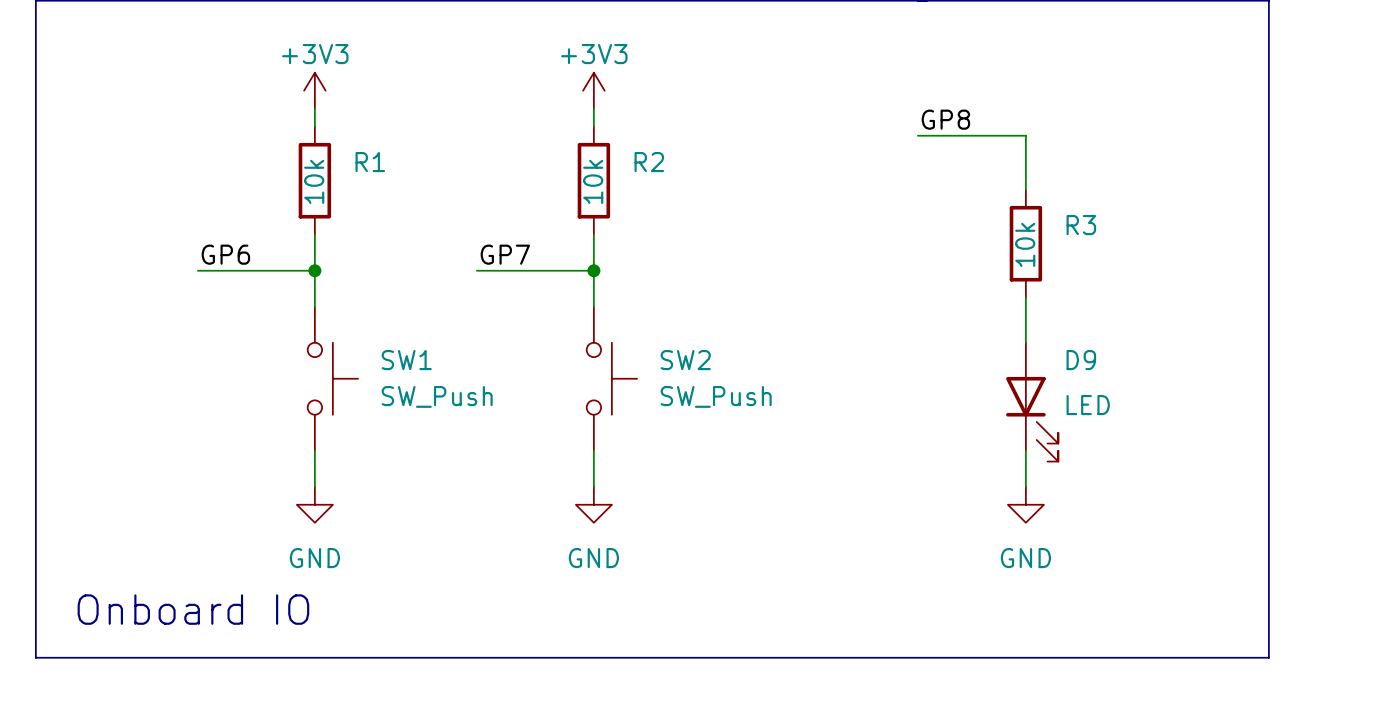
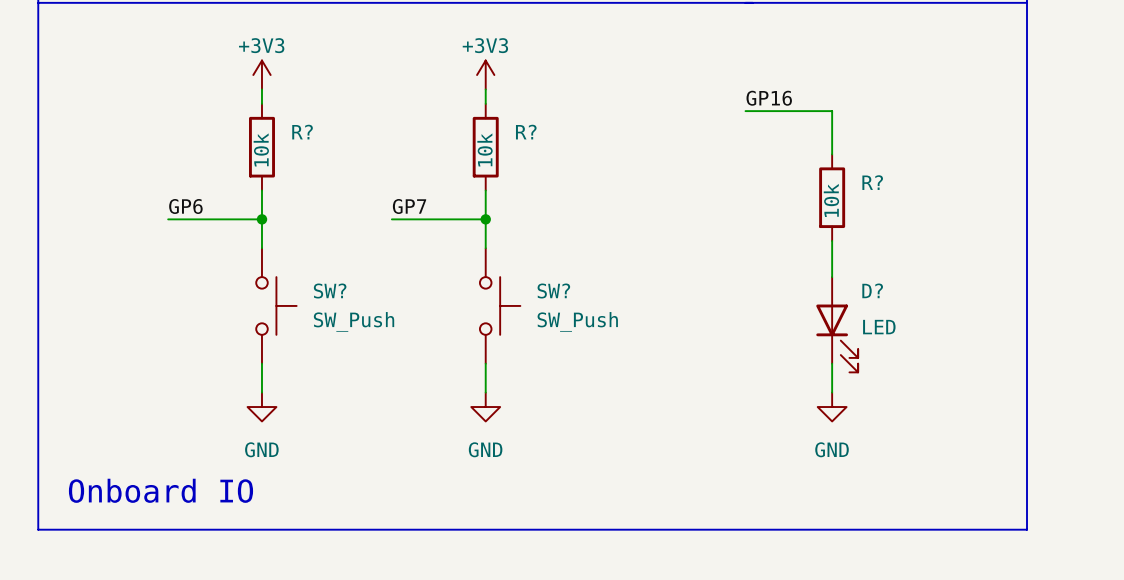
label: GP8 (945, 119) -> GP16 (769, 98)
R1 name: R1 (370, 162) -> R? (302, 132)
R2 name: R2 (649, 162) -> R? (526, 132)
R3 name: R3 (1081, 225) -> R? (872, 182)
SW1 name: SW1 (406, 360) -> SW? (330, 291)
SW2 name: SW2 (685, 360) -> SW? (553, 291)
D9 name: D9 (1081, 360) -> D? (872, 290)

